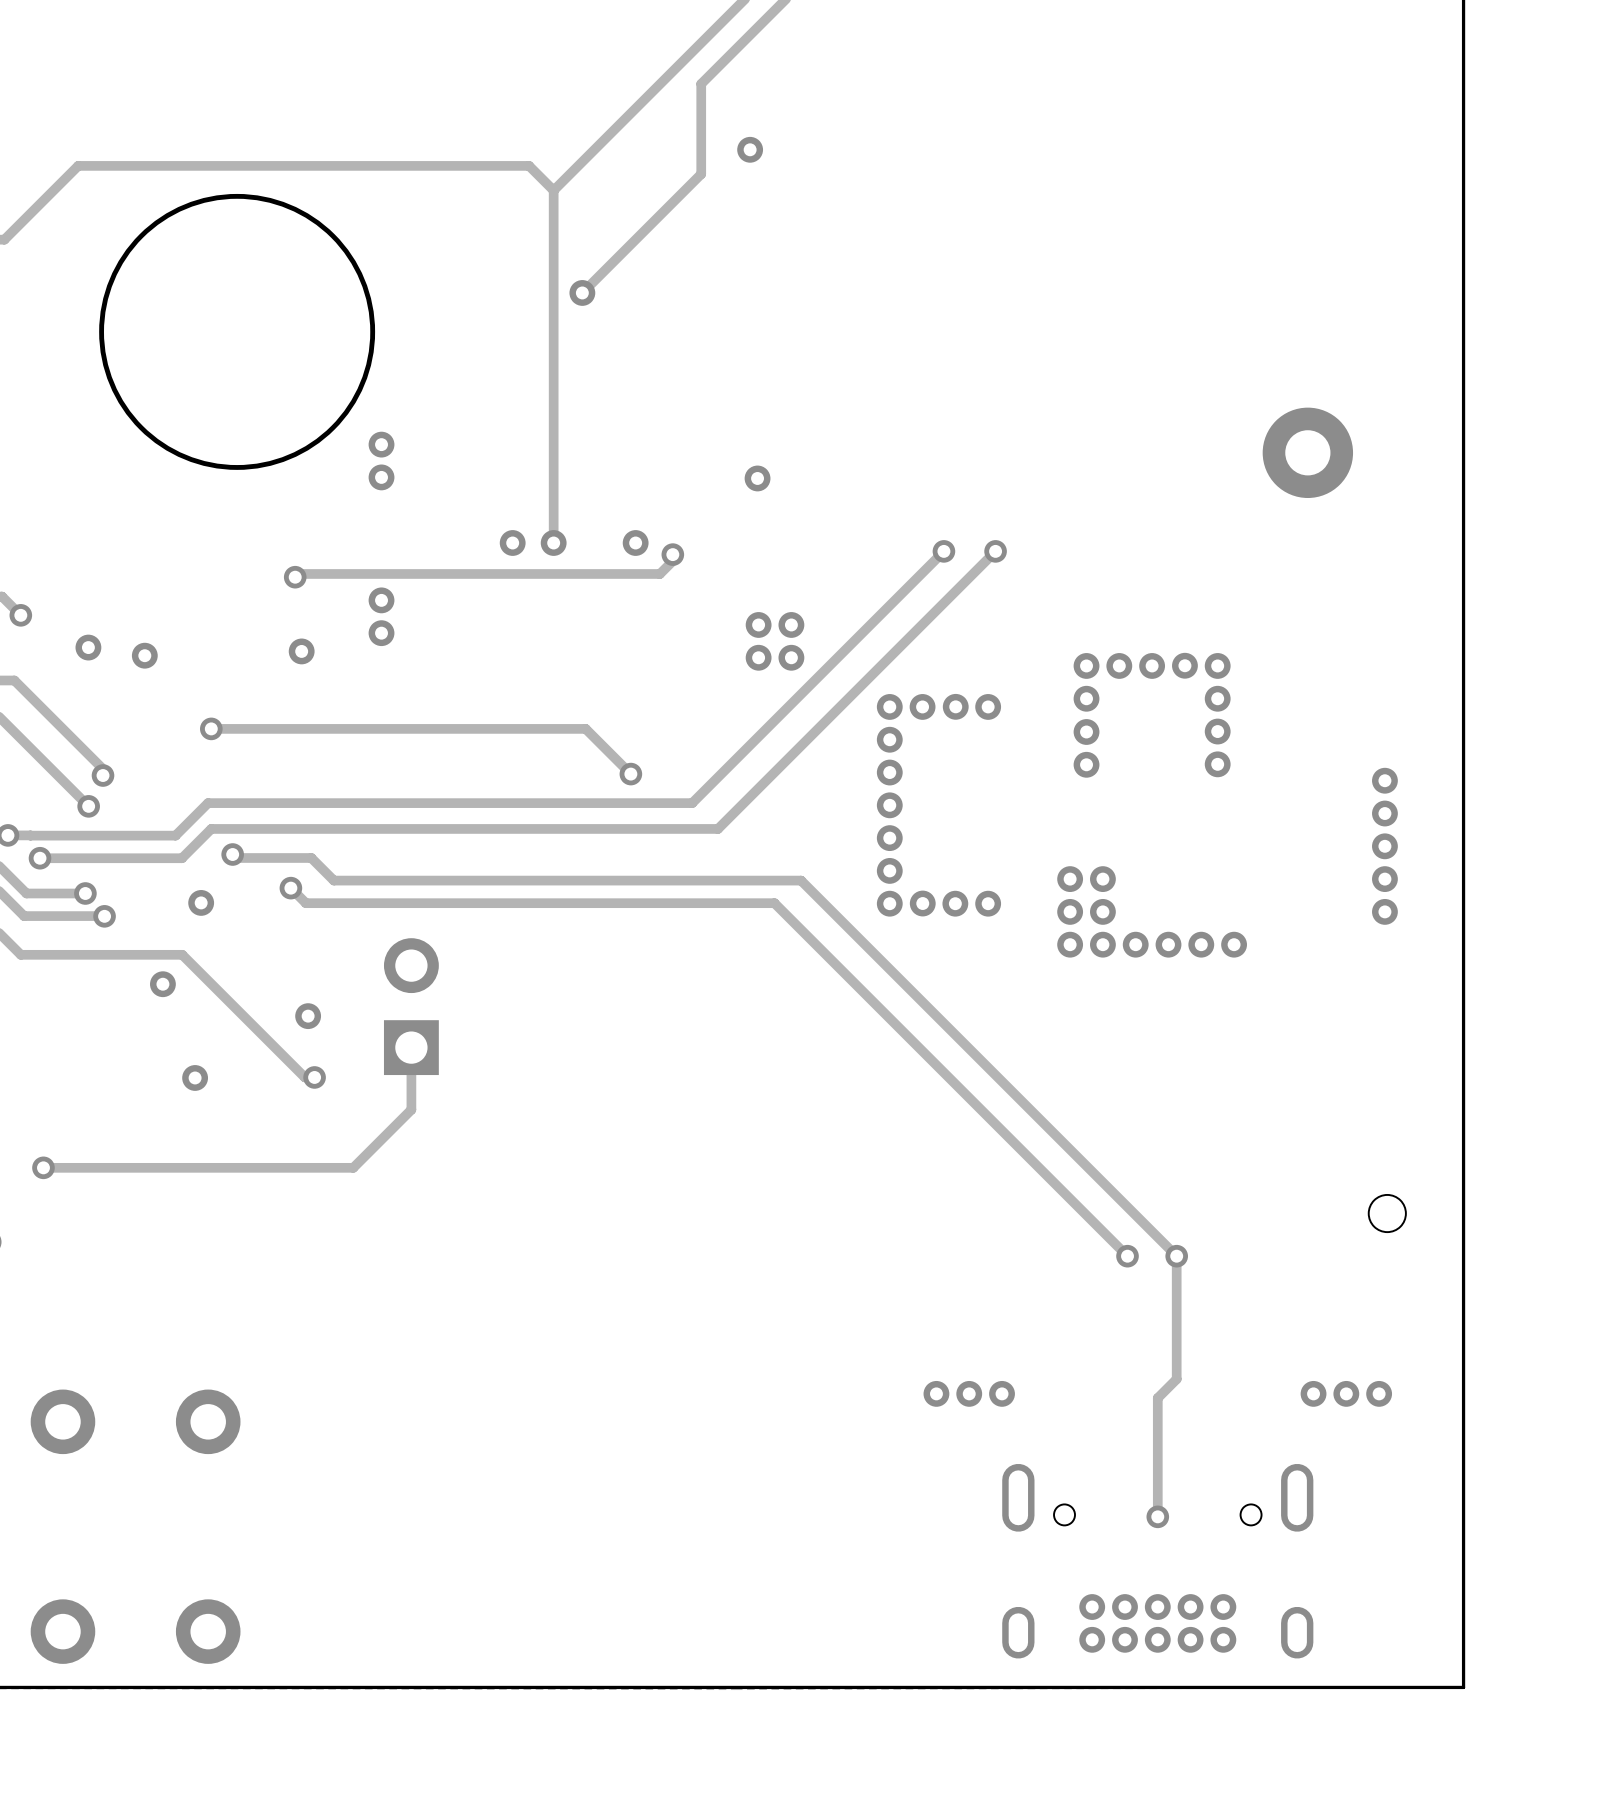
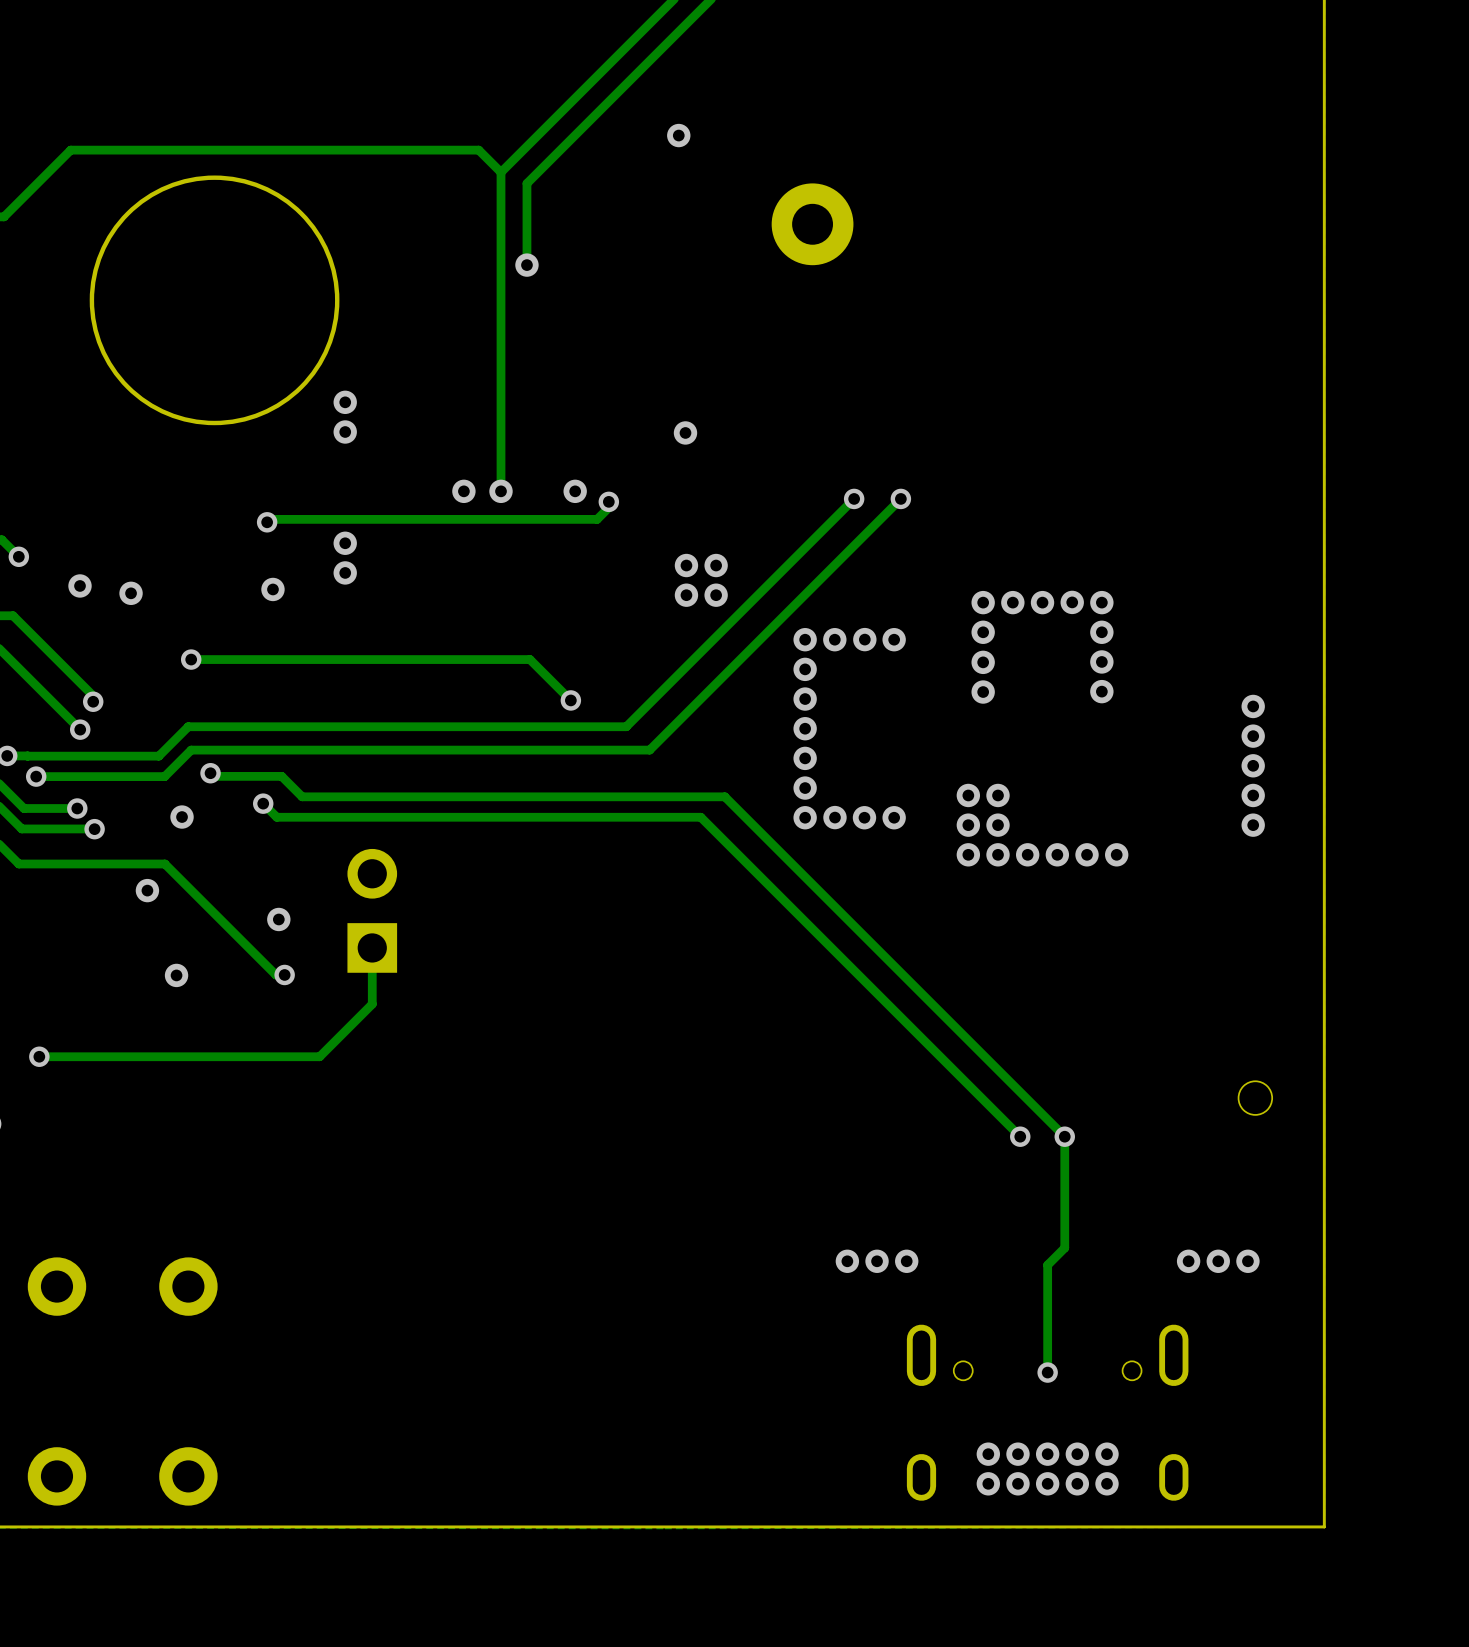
track: (701, 83) (701, 174) (582, 292) -> (634, 75) (526, 183) (526, 265)
part position: (1307, 452) -> (812, 224)

